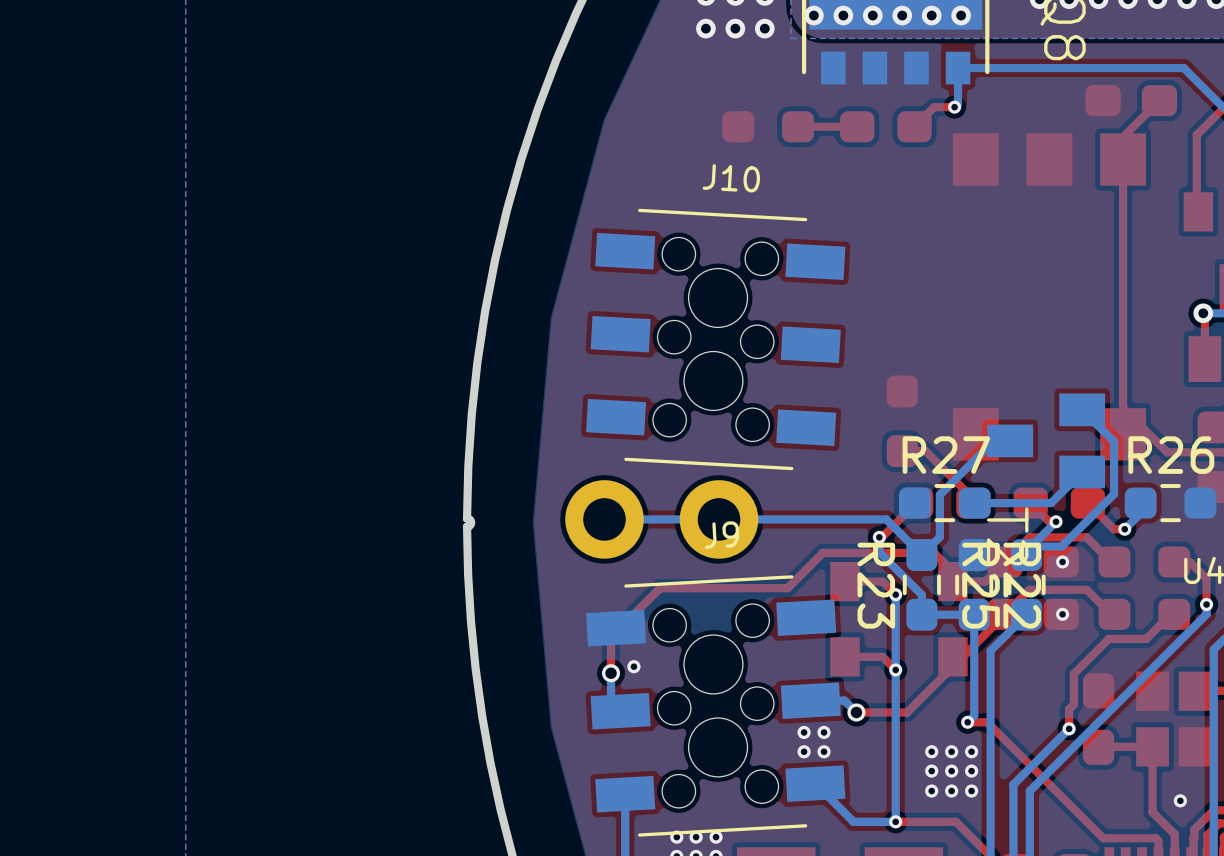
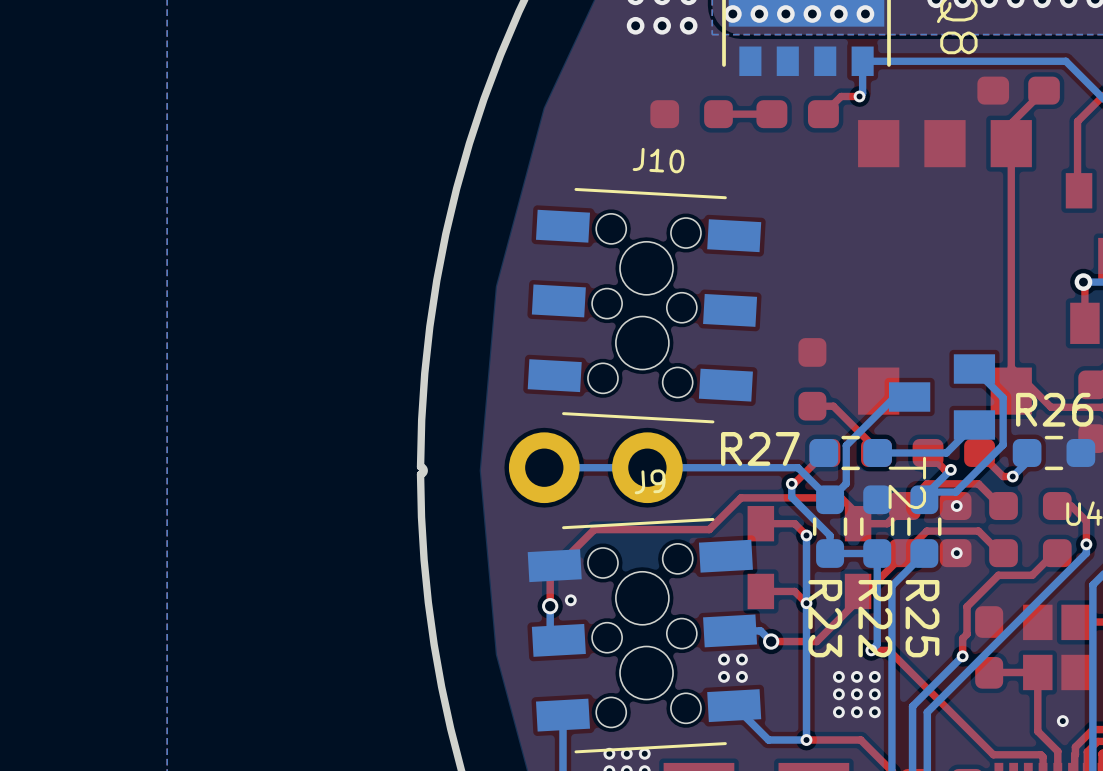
R27 name position: R27 (946, 455) -> R27 (760, 448)
R23 name position: R23 (876, 585) -> R23 (825, 618)
R25 name position: R25 (981, 585) -> R25 (922, 618)
R22 name position: R22 (1022, 585) -> R22 (875, 618)

